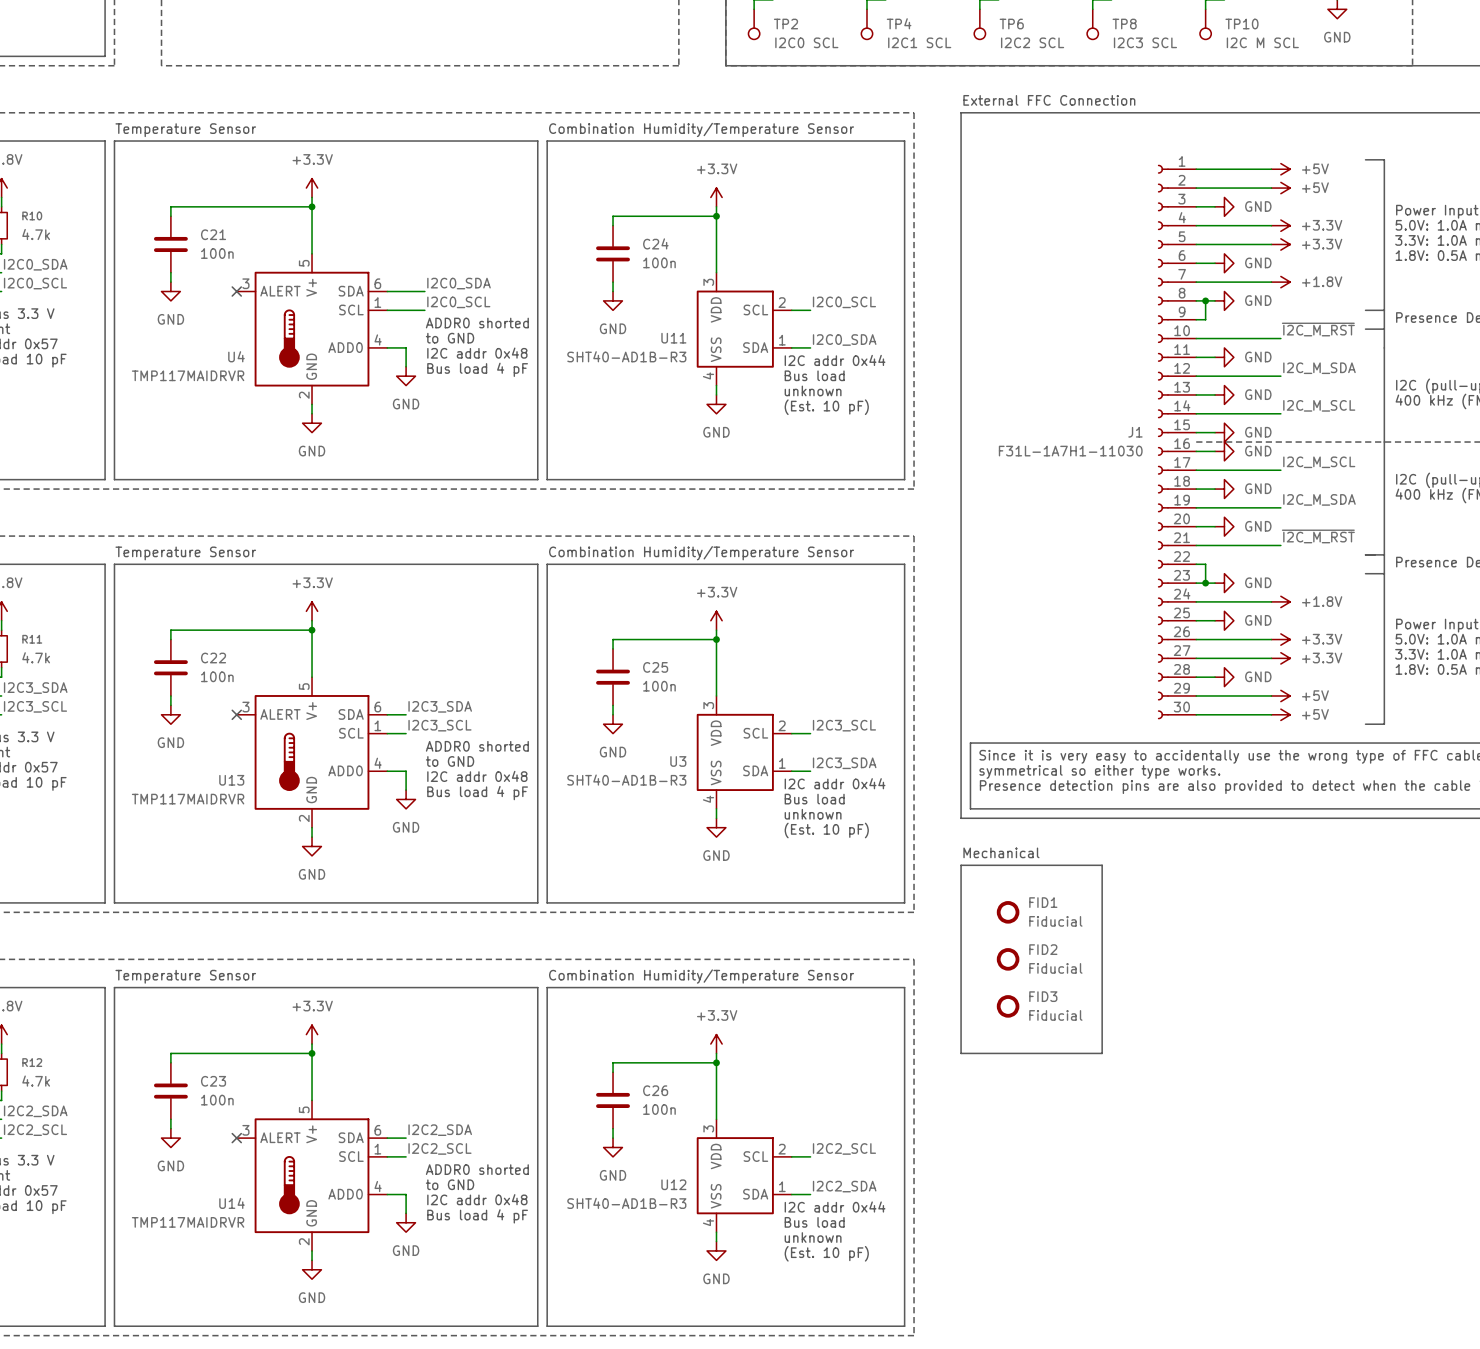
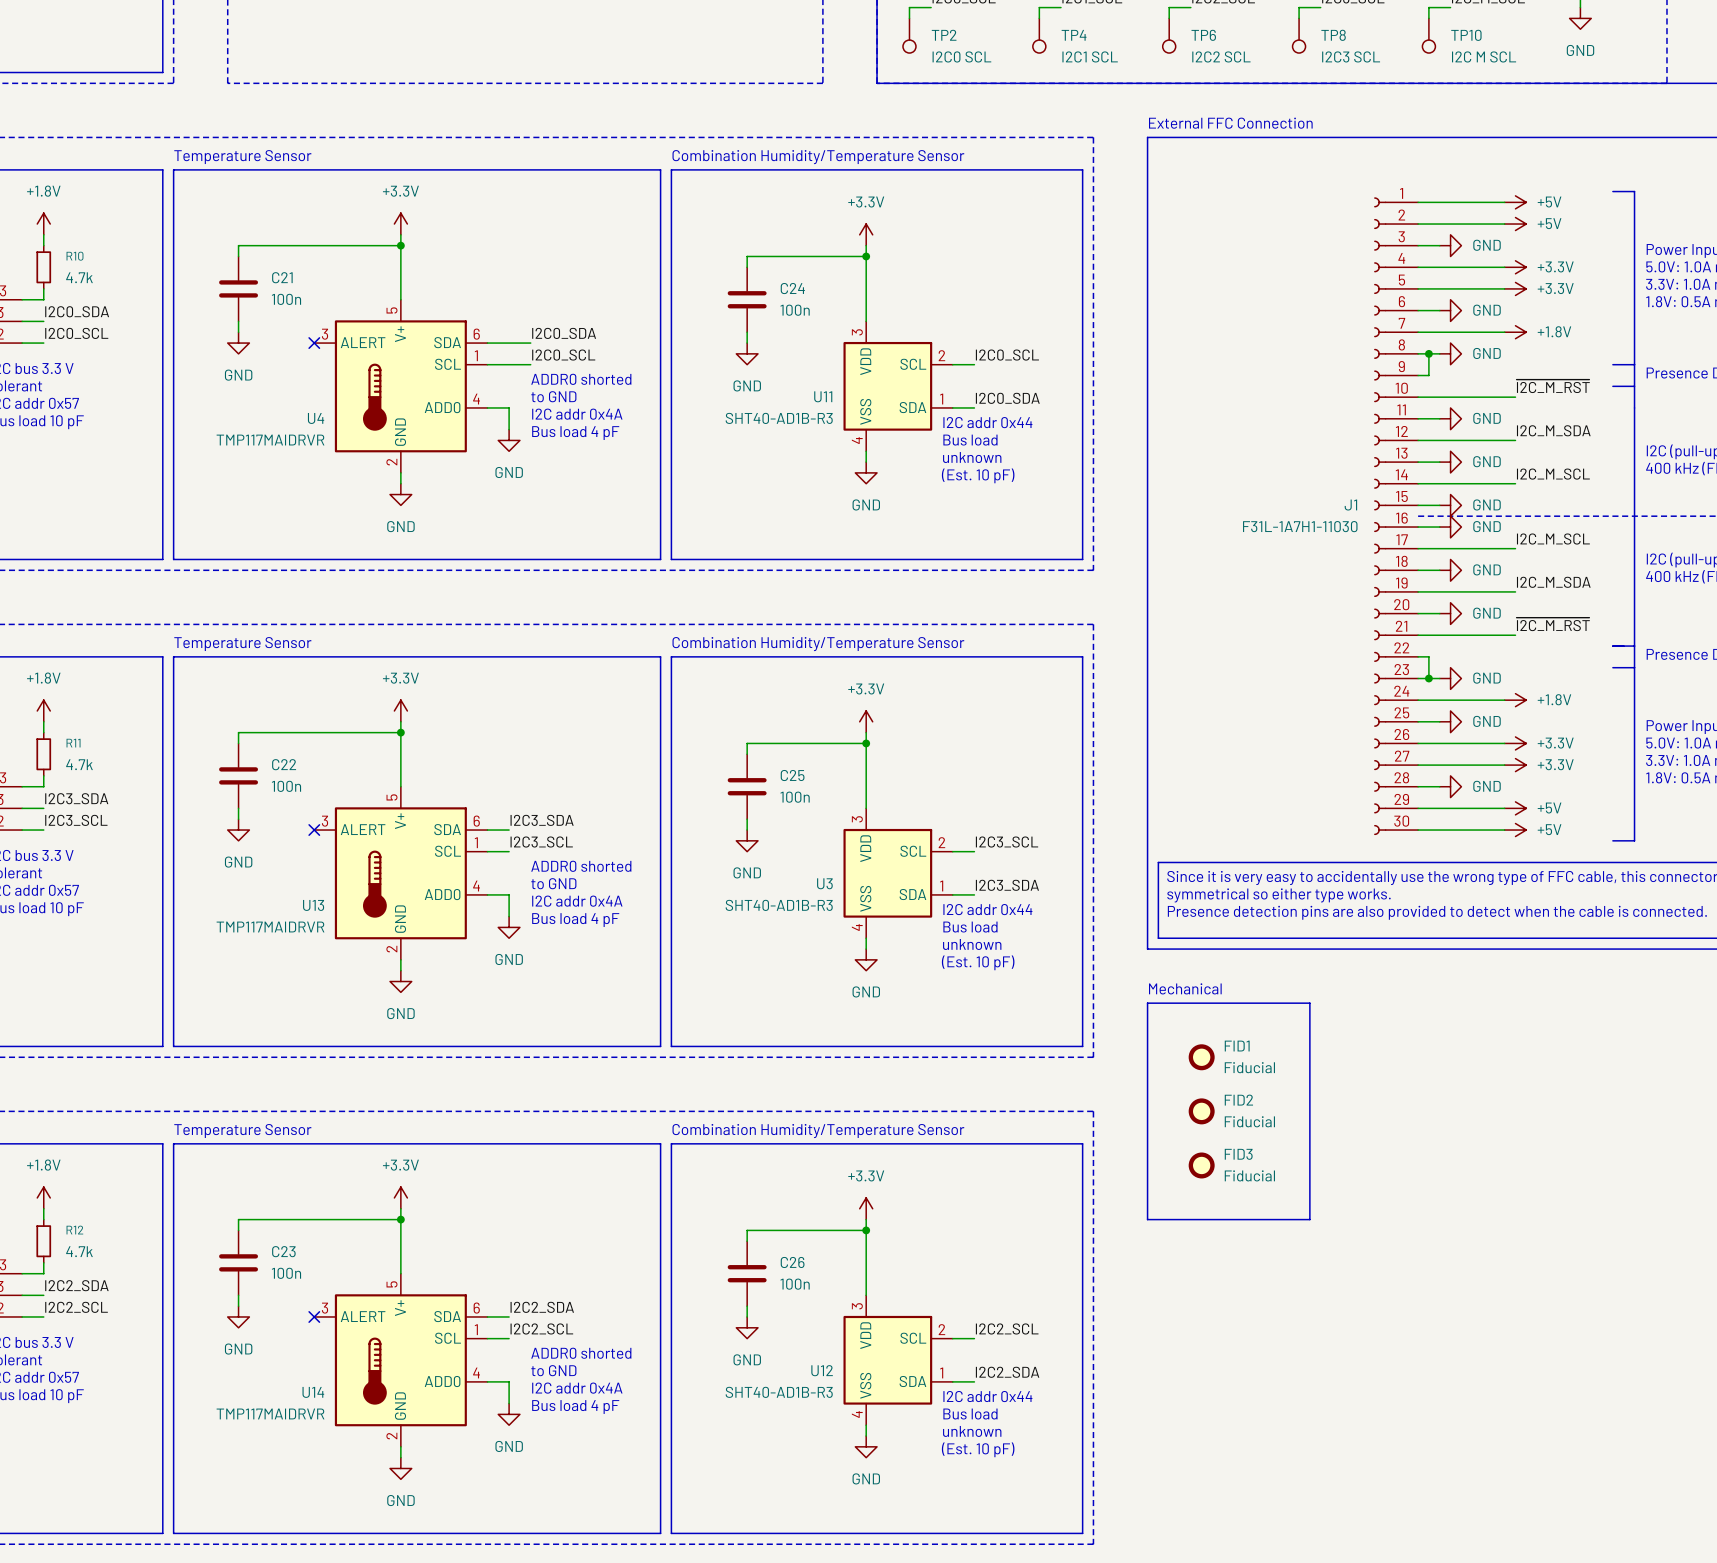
text: I2C addr 0x48 (477, 353) -> I2C addr 0x4A (577, 414)
text: I2C addr 0x48 (477, 776) -> I2C addr 0x4A (577, 901)
text: I2C addr 0x48 (477, 1199) -> I2C addr 0x4A (577, 1388)

